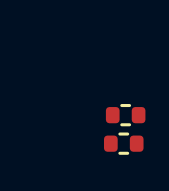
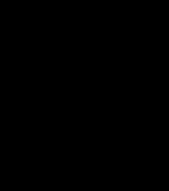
part: (125, 115) -> none
part: (123, 143) -> none

